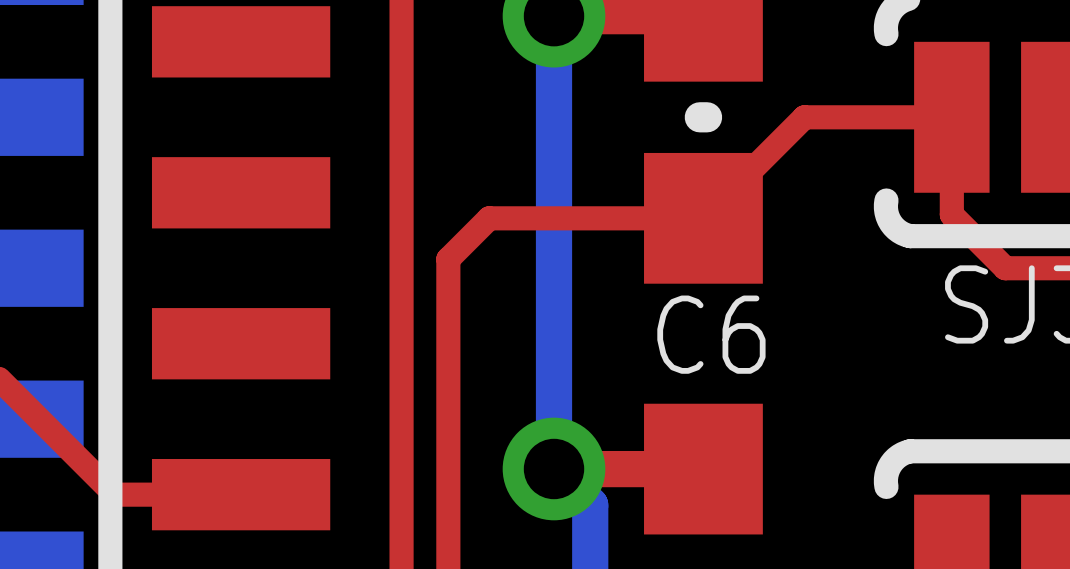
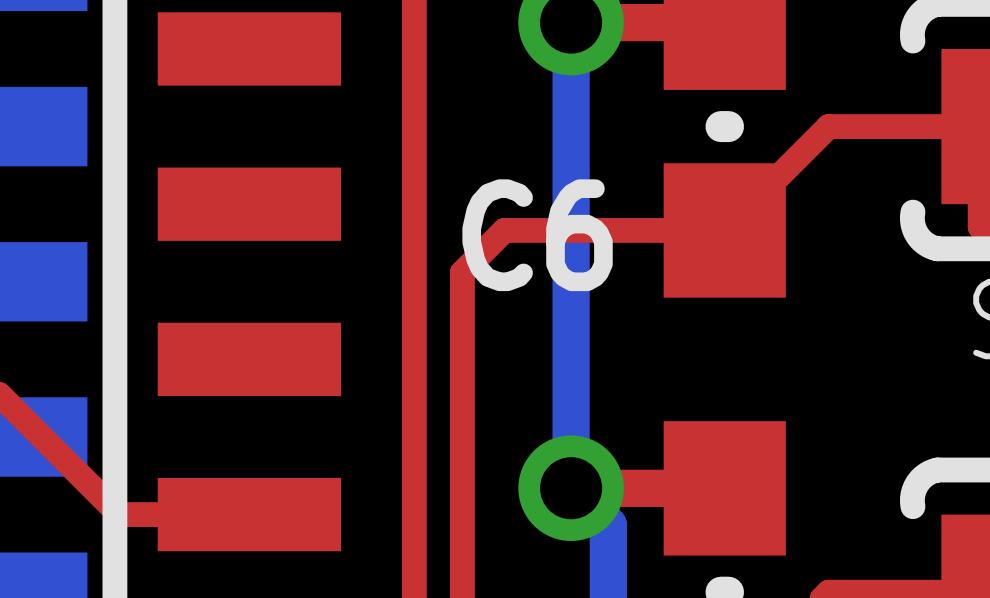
C6 name position: C6 (711, 334) -> C6 (537, 235)

